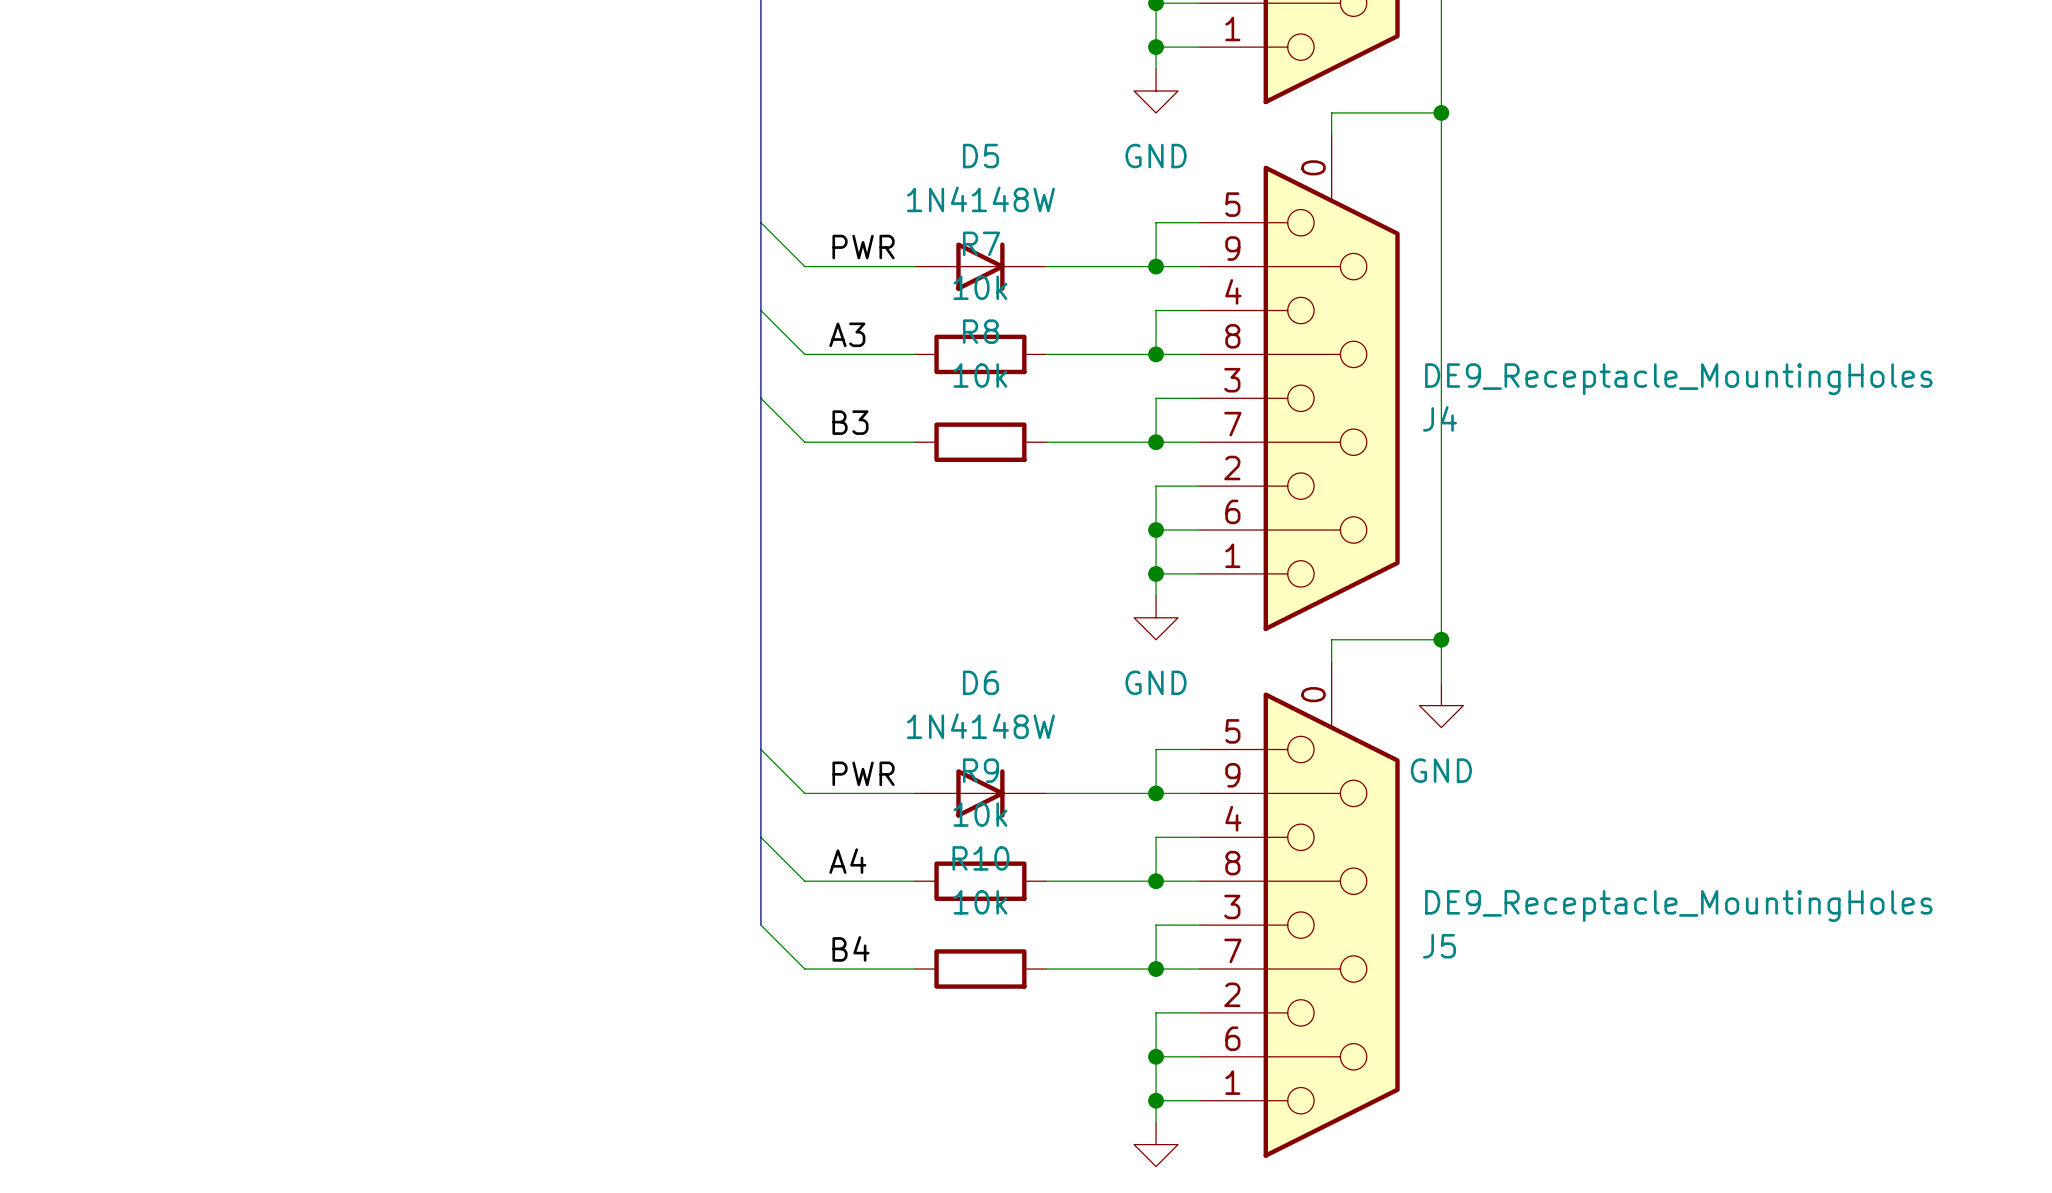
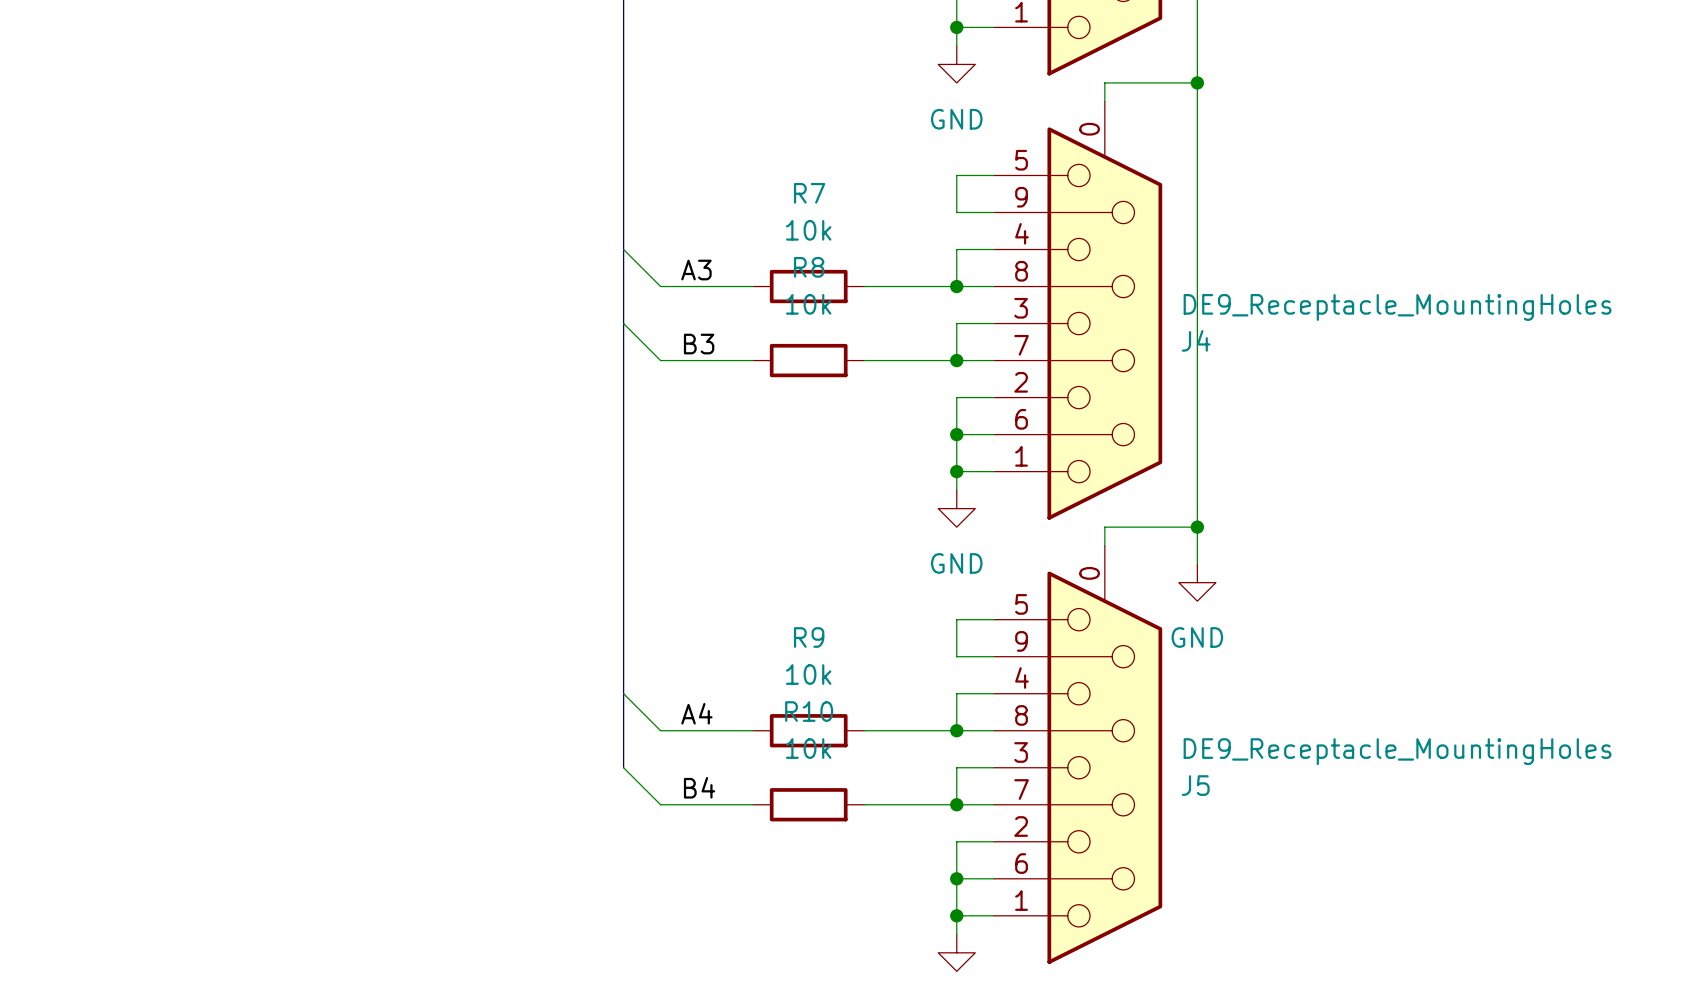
wire: (760, 222) (804, 266) (914, 266) -> none
label: PWR (863, 247) -> none
D5: 1N4148W (980, 266) -> none
wire: (1046, 266) (1156, 266) -> none
junction: (1156, 266) -> none
wire: (760, 749) (804, 793) (914, 793) -> none
label: PWR (863, 773) -> none
D6: 1N4148W (980, 793) -> none
wire: (1046, 793) (1156, 793) -> none
junction: (1156, 793) -> none

